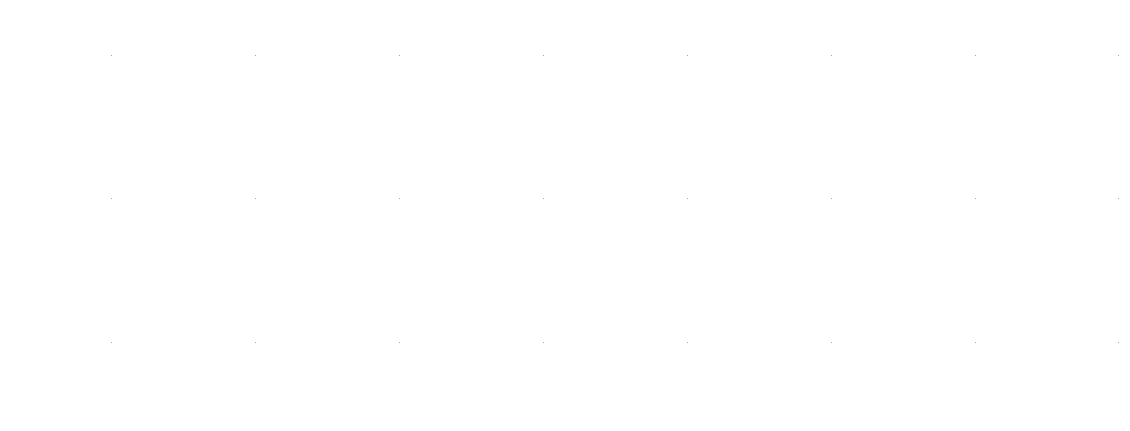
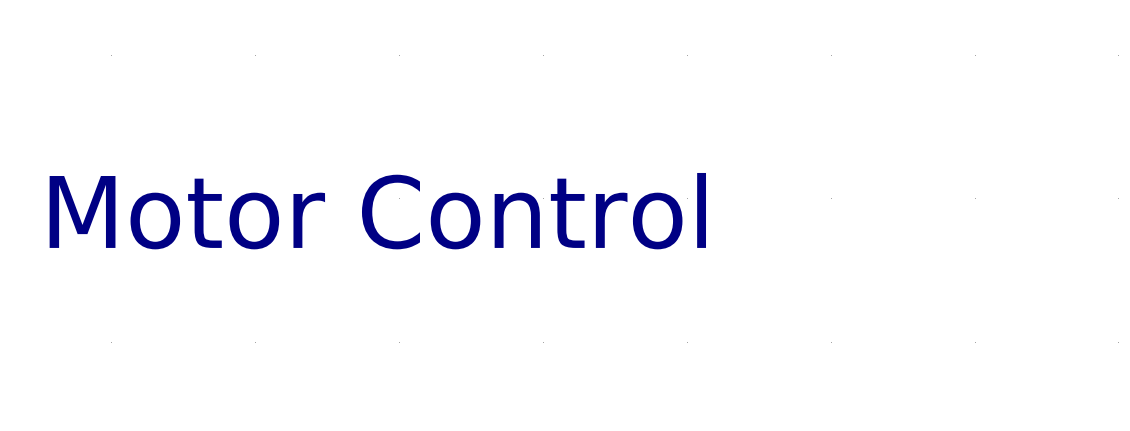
text: none -> Motor Control (377, 211)

